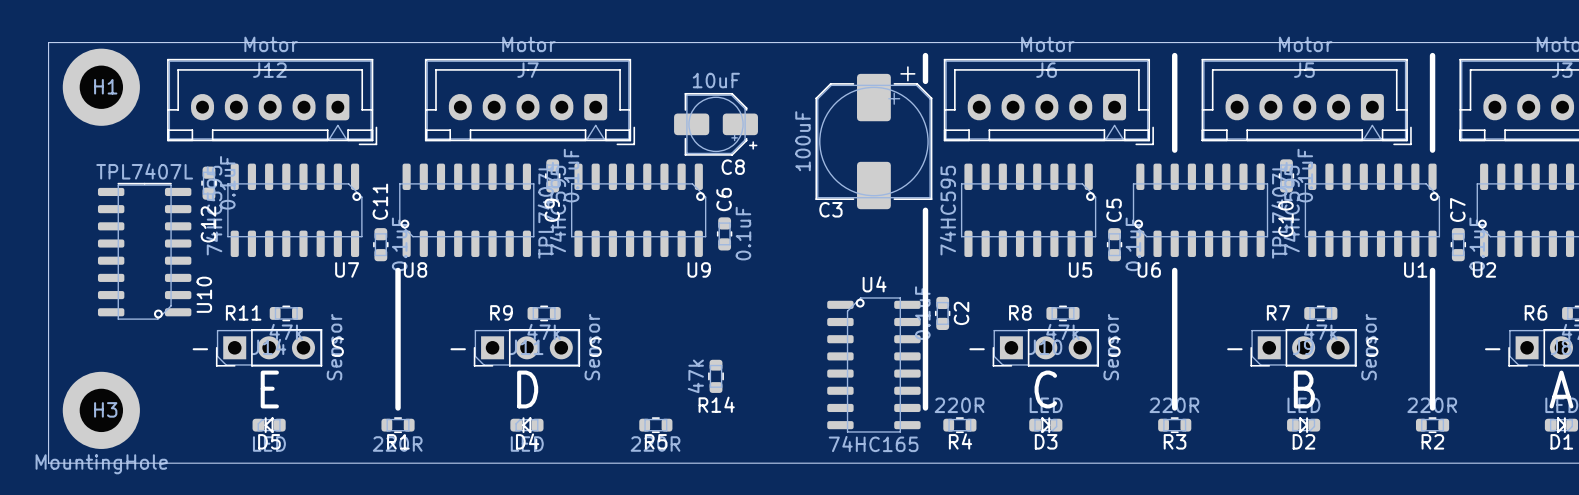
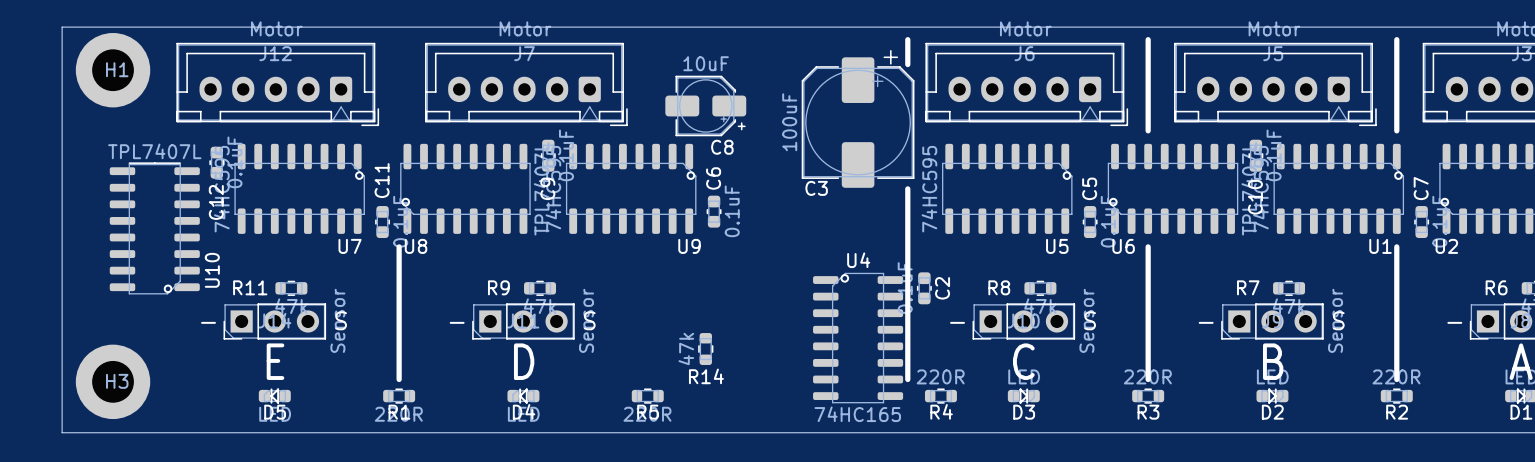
H3 value: MountingHole (101, 464) -> none

